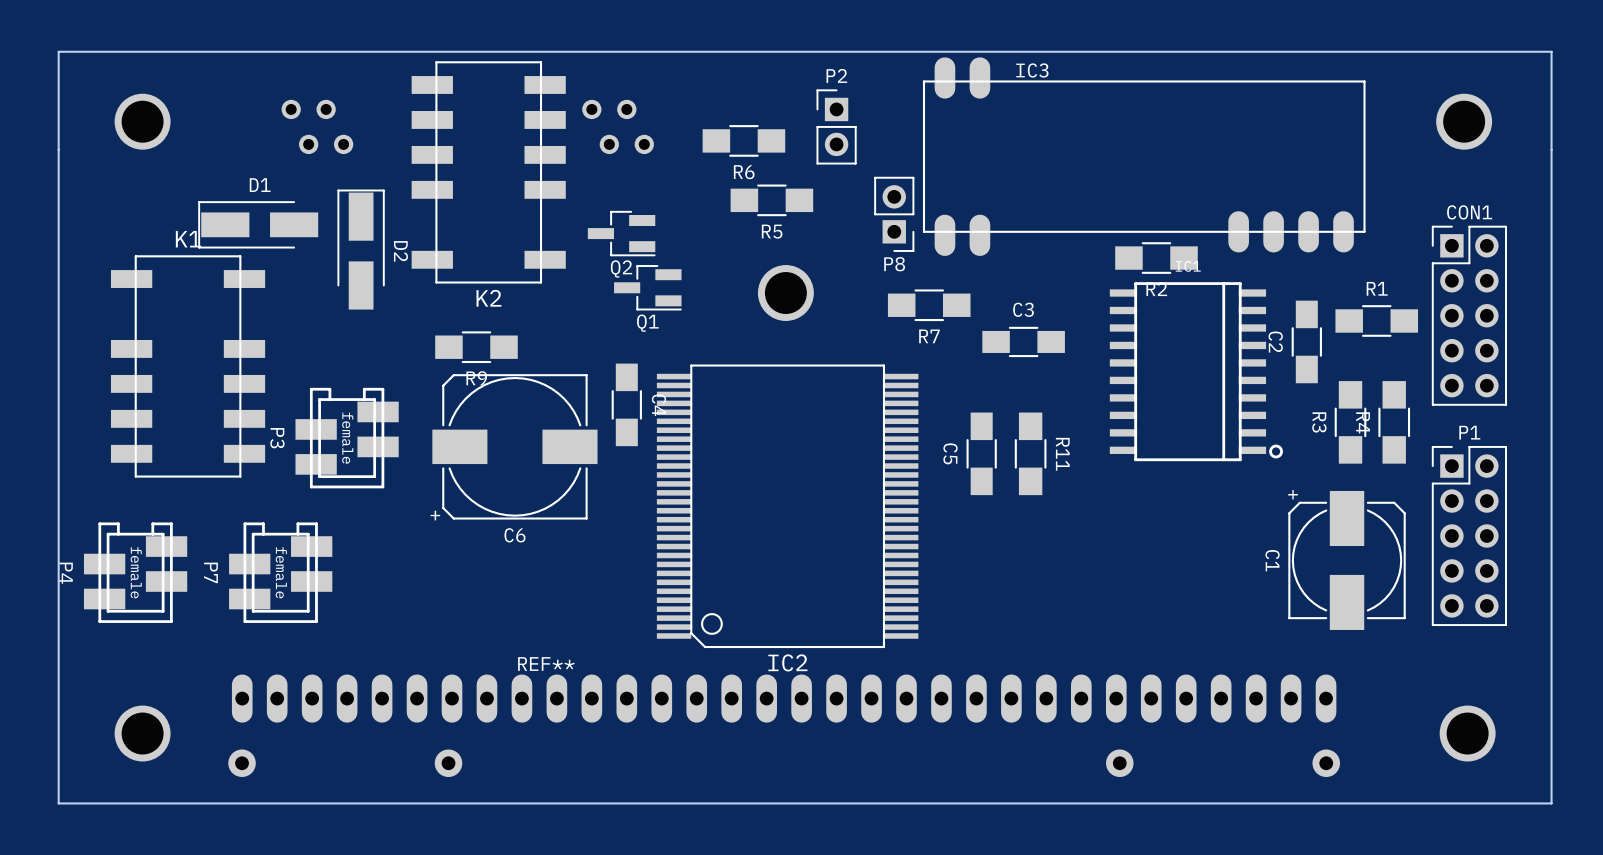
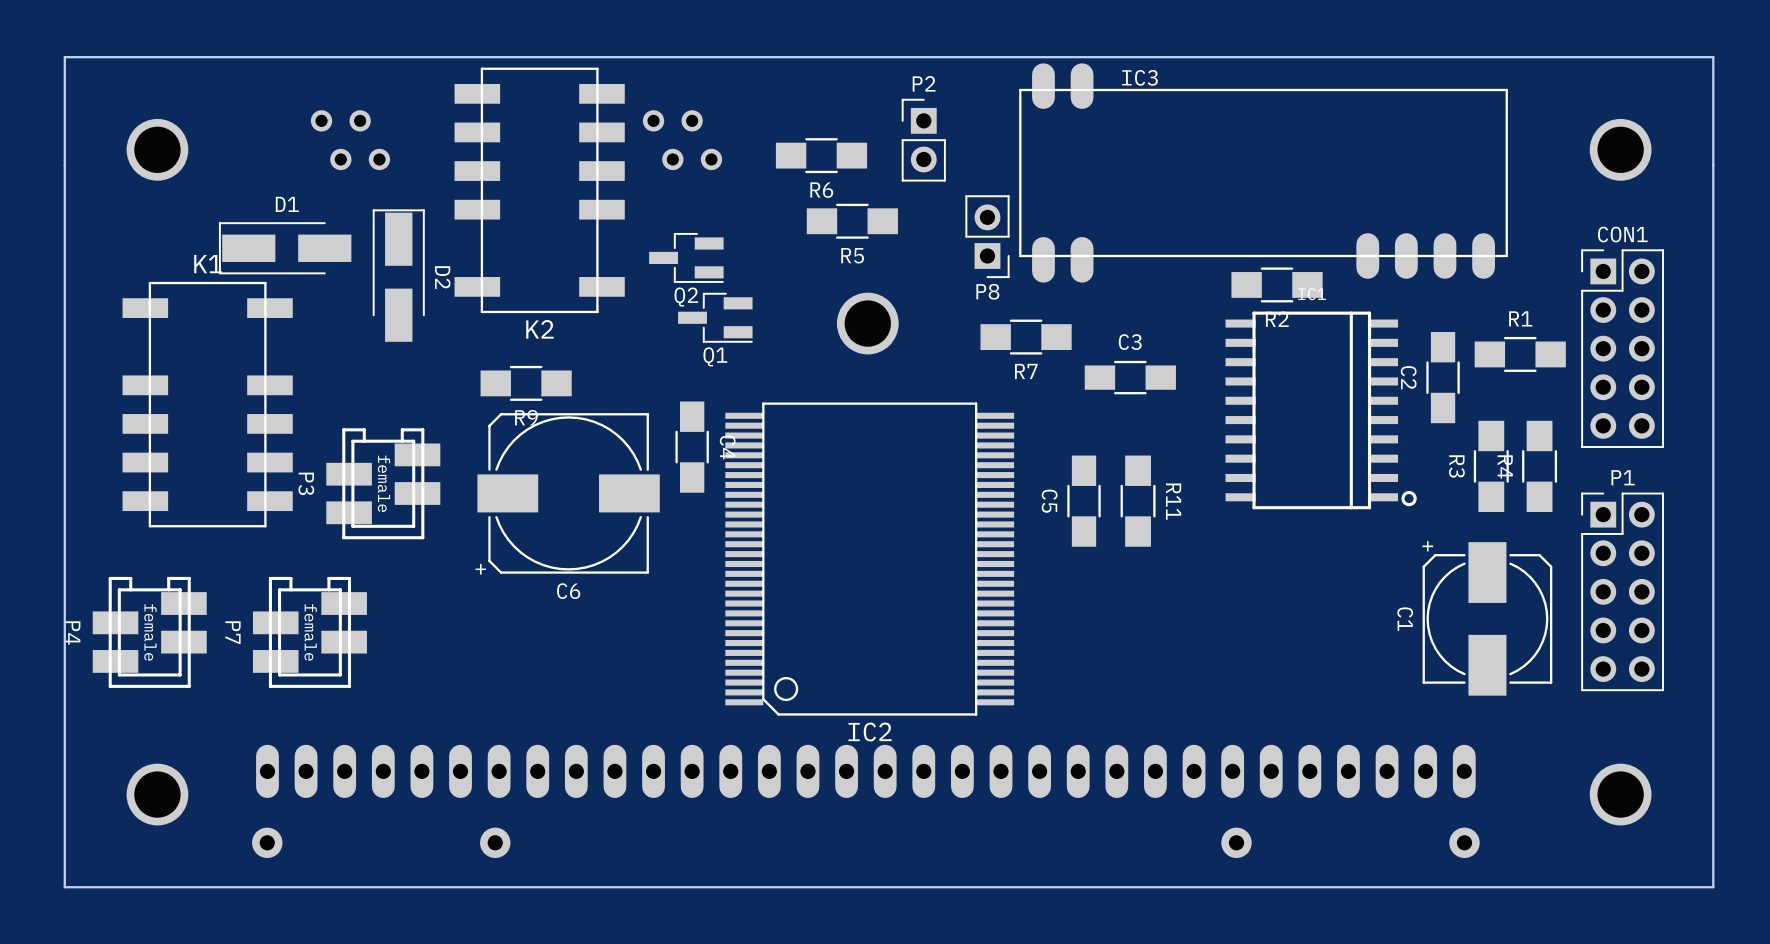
part position: (142, 121) -> (157, 149)
part position: (1464, 121) -> (1620, 149)
REF**: (546, 664) -> none
part position: (142, 733) -> (157, 794)
part position: (1467, 733) -> (1620, 794)

